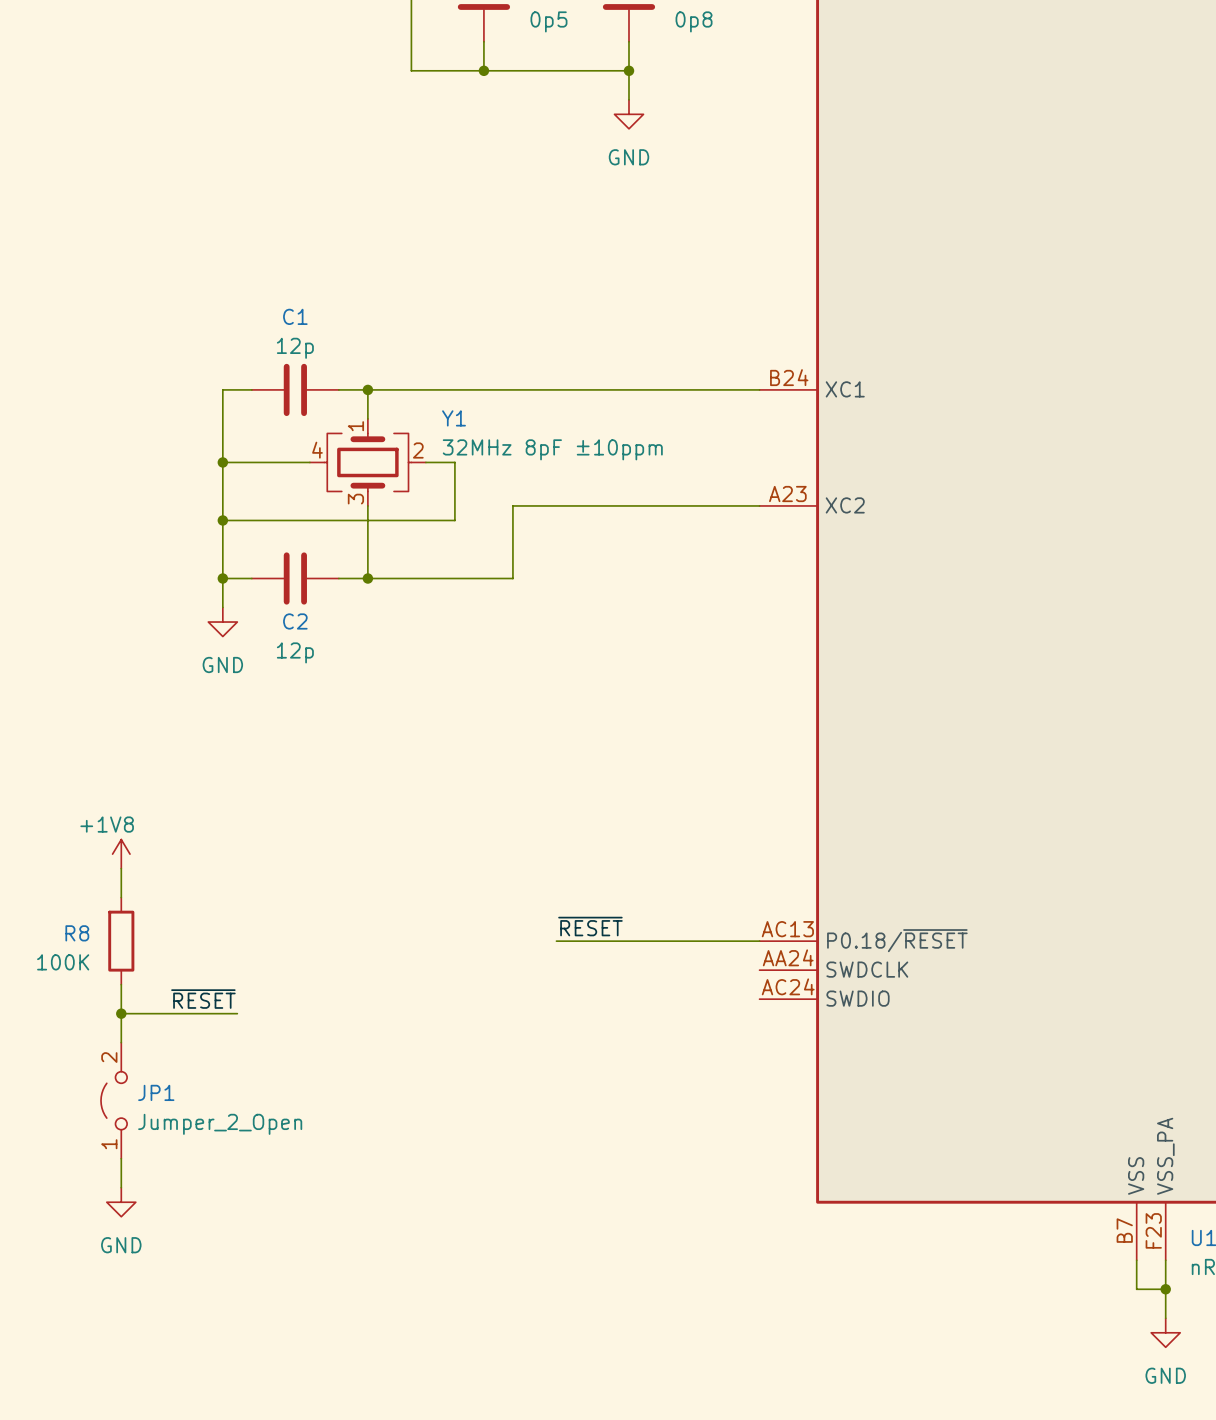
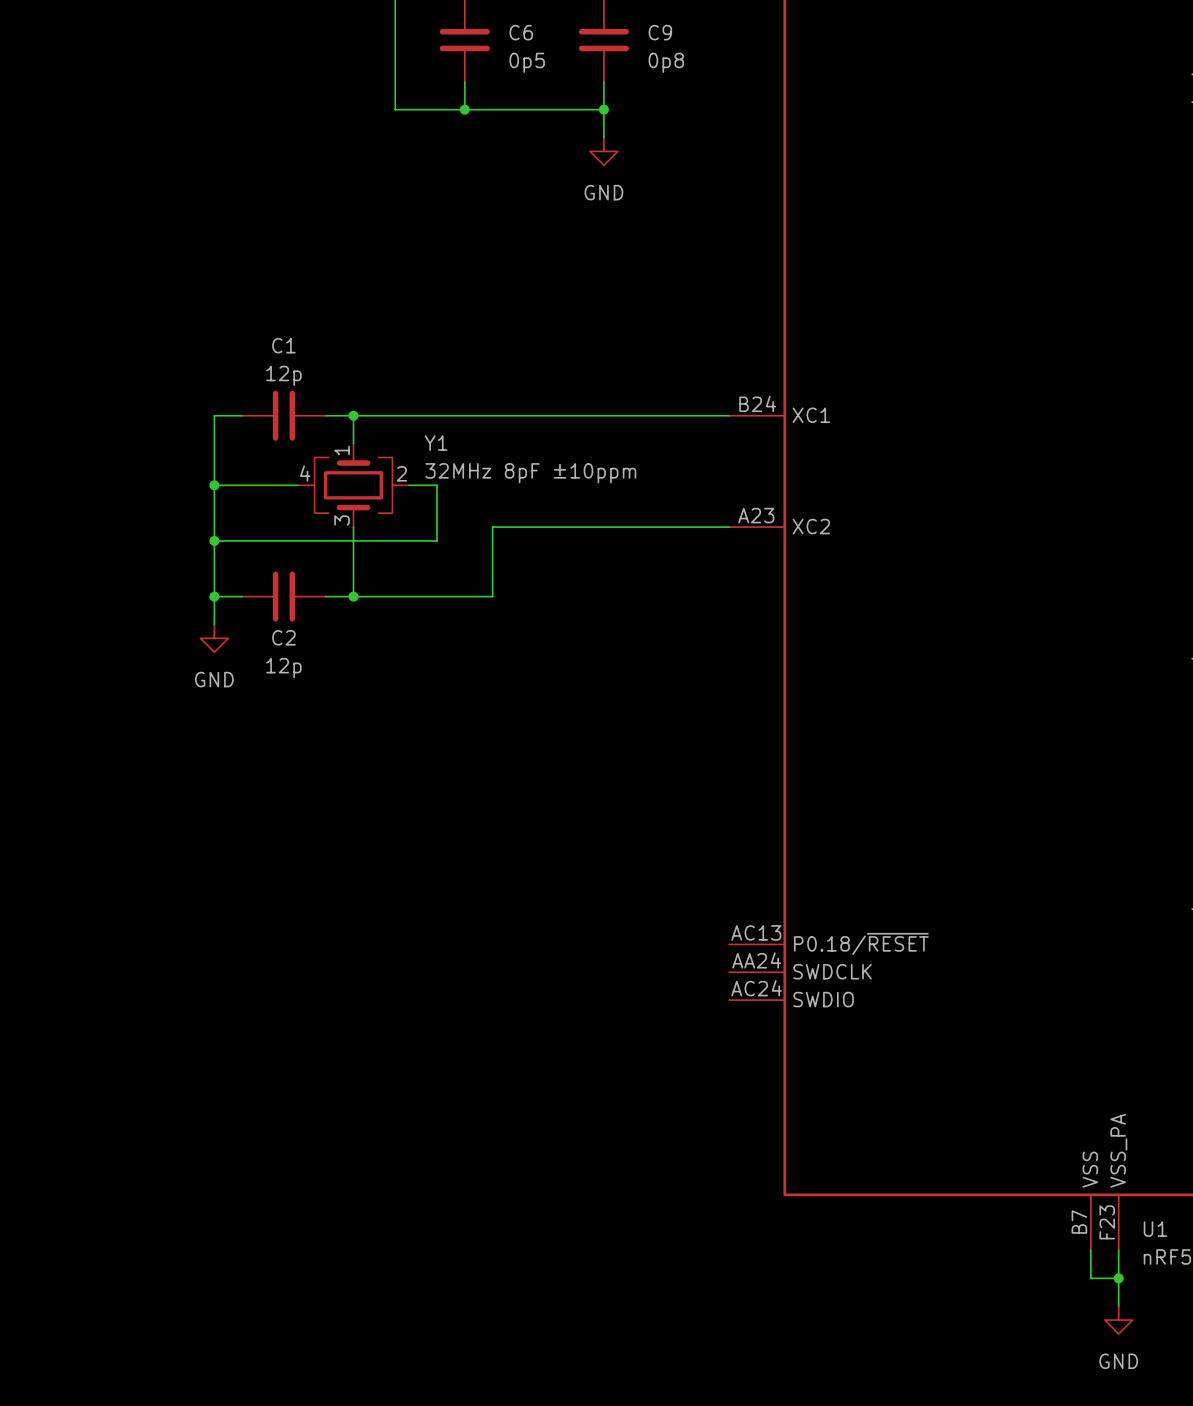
power symbol: +1V8 (121, 854) -> none
wire: (121, 868) (121, 897) -> none
label: ~{RESET} (590, 926) -> none
R8: 100K (121, 941) -> none
wire: (556, 941) (759, 941) -> none
wire: (121, 984) (121, 1042) -> none
label: ~{RESET} (203, 999) -> none
wire: (121, 1013) (237, 1013) -> none
junction: (121, 1013) -> none
JP1: Jumper_2_Open (114, 1100) -> none
wire: (121, 1158) (121, 1187) -> none
power symbol: GND (121, 1202) -> none

